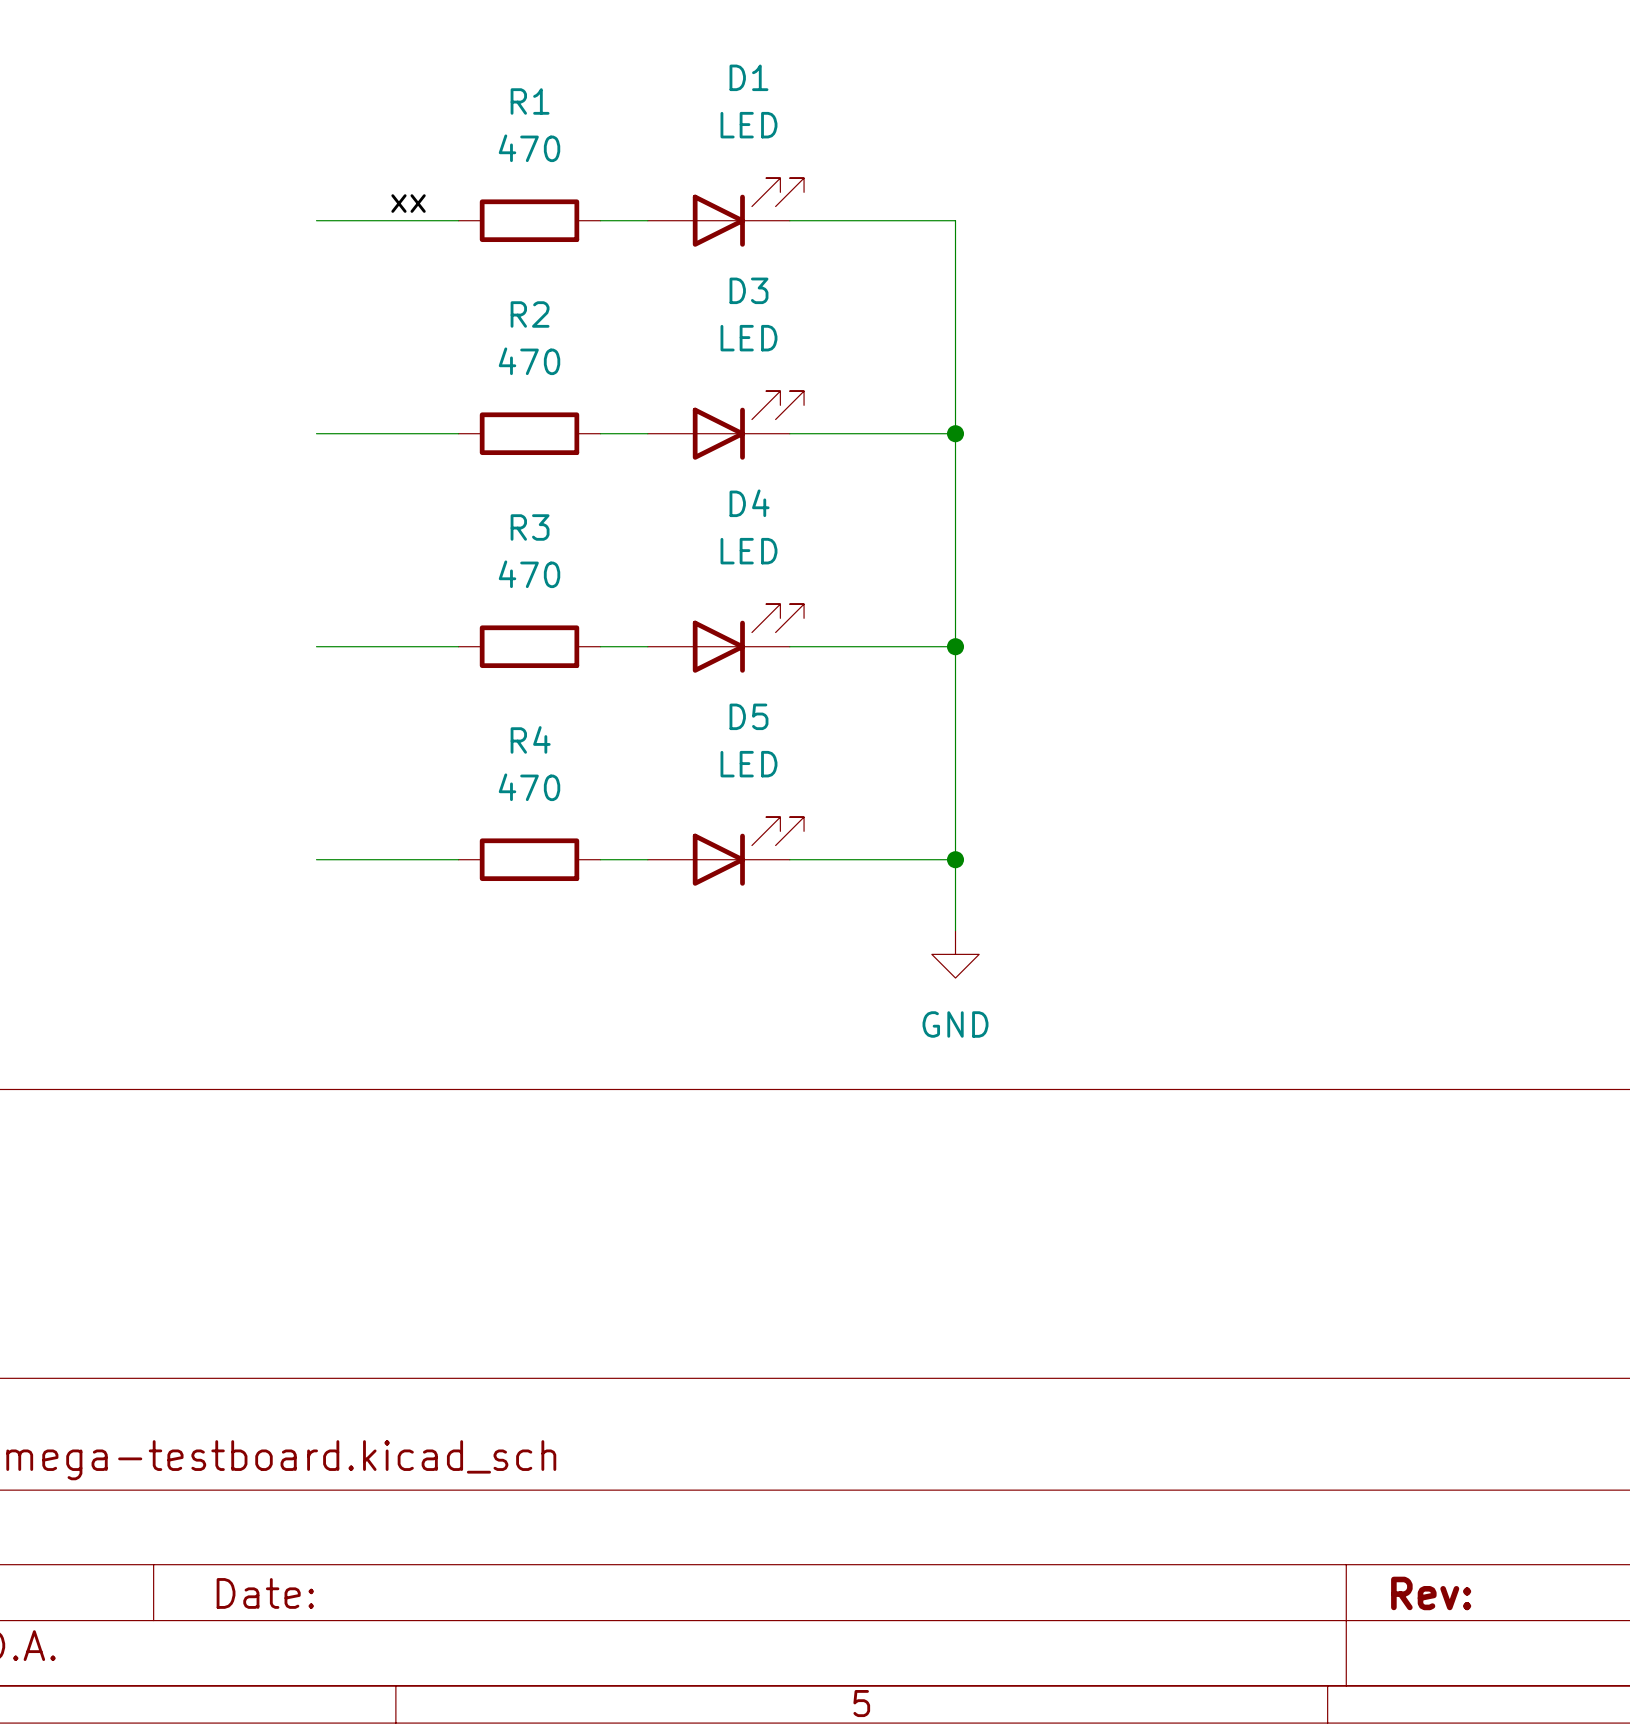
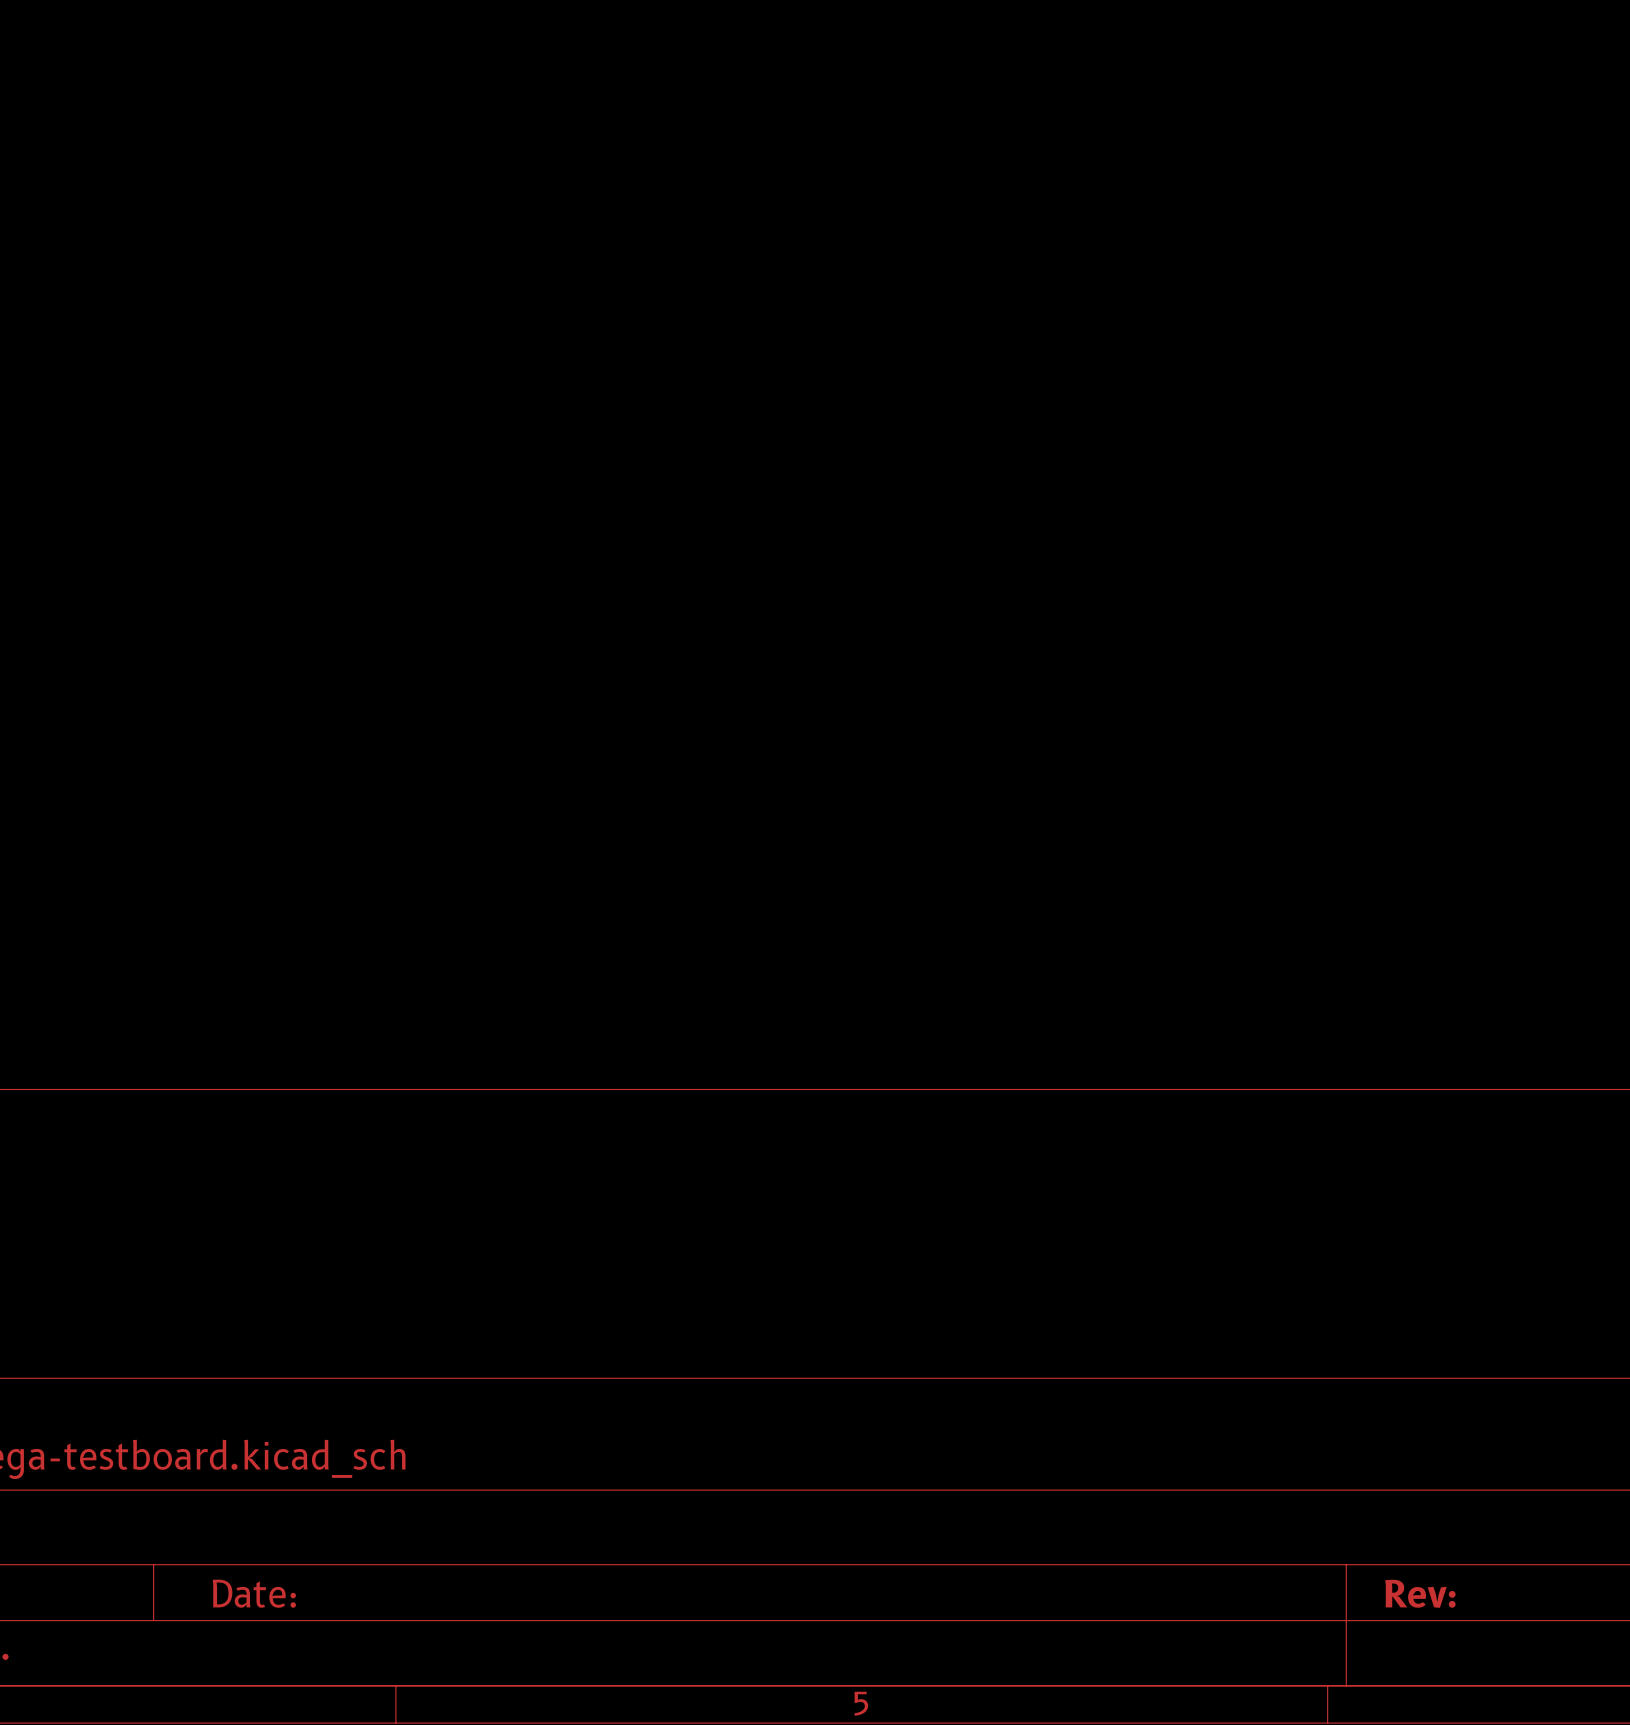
label: xx (408, 203) -> none
D1: LED (725, 212) -> none
wire: (316, 220) (458, 220) -> none
R1: 470 (529, 220) -> none
wire: (600, 220) (647, 220) -> none
wire: (789, 220) (955, 220) (955, 930) -> none
D3: LED (725, 425) -> none
wire: (316, 433) (458, 433) -> none
R2: 470 (529, 433) -> none
wire: (600, 433) (647, 433) -> none
wire: (789, 433) (955, 433) -> none
junction: (955, 433) -> none
D4: LED (725, 638) -> none
wire: (316, 646) (458, 646) -> none
R3: 470 (529, 646) -> none
wire: (600, 646) (647, 646) -> none
wire: (789, 646) (955, 646) -> none
junction: (955, 646) -> none
D5: LED (725, 851) -> none
wire: (316, 859) (458, 859) -> none
R4: 470 (529, 859) -> none
wire: (600, 859) (647, 859) -> none
wire: (789, 859) (955, 859) -> none
junction: (955, 859) -> none
power symbol: GND (955, 954) -> none

